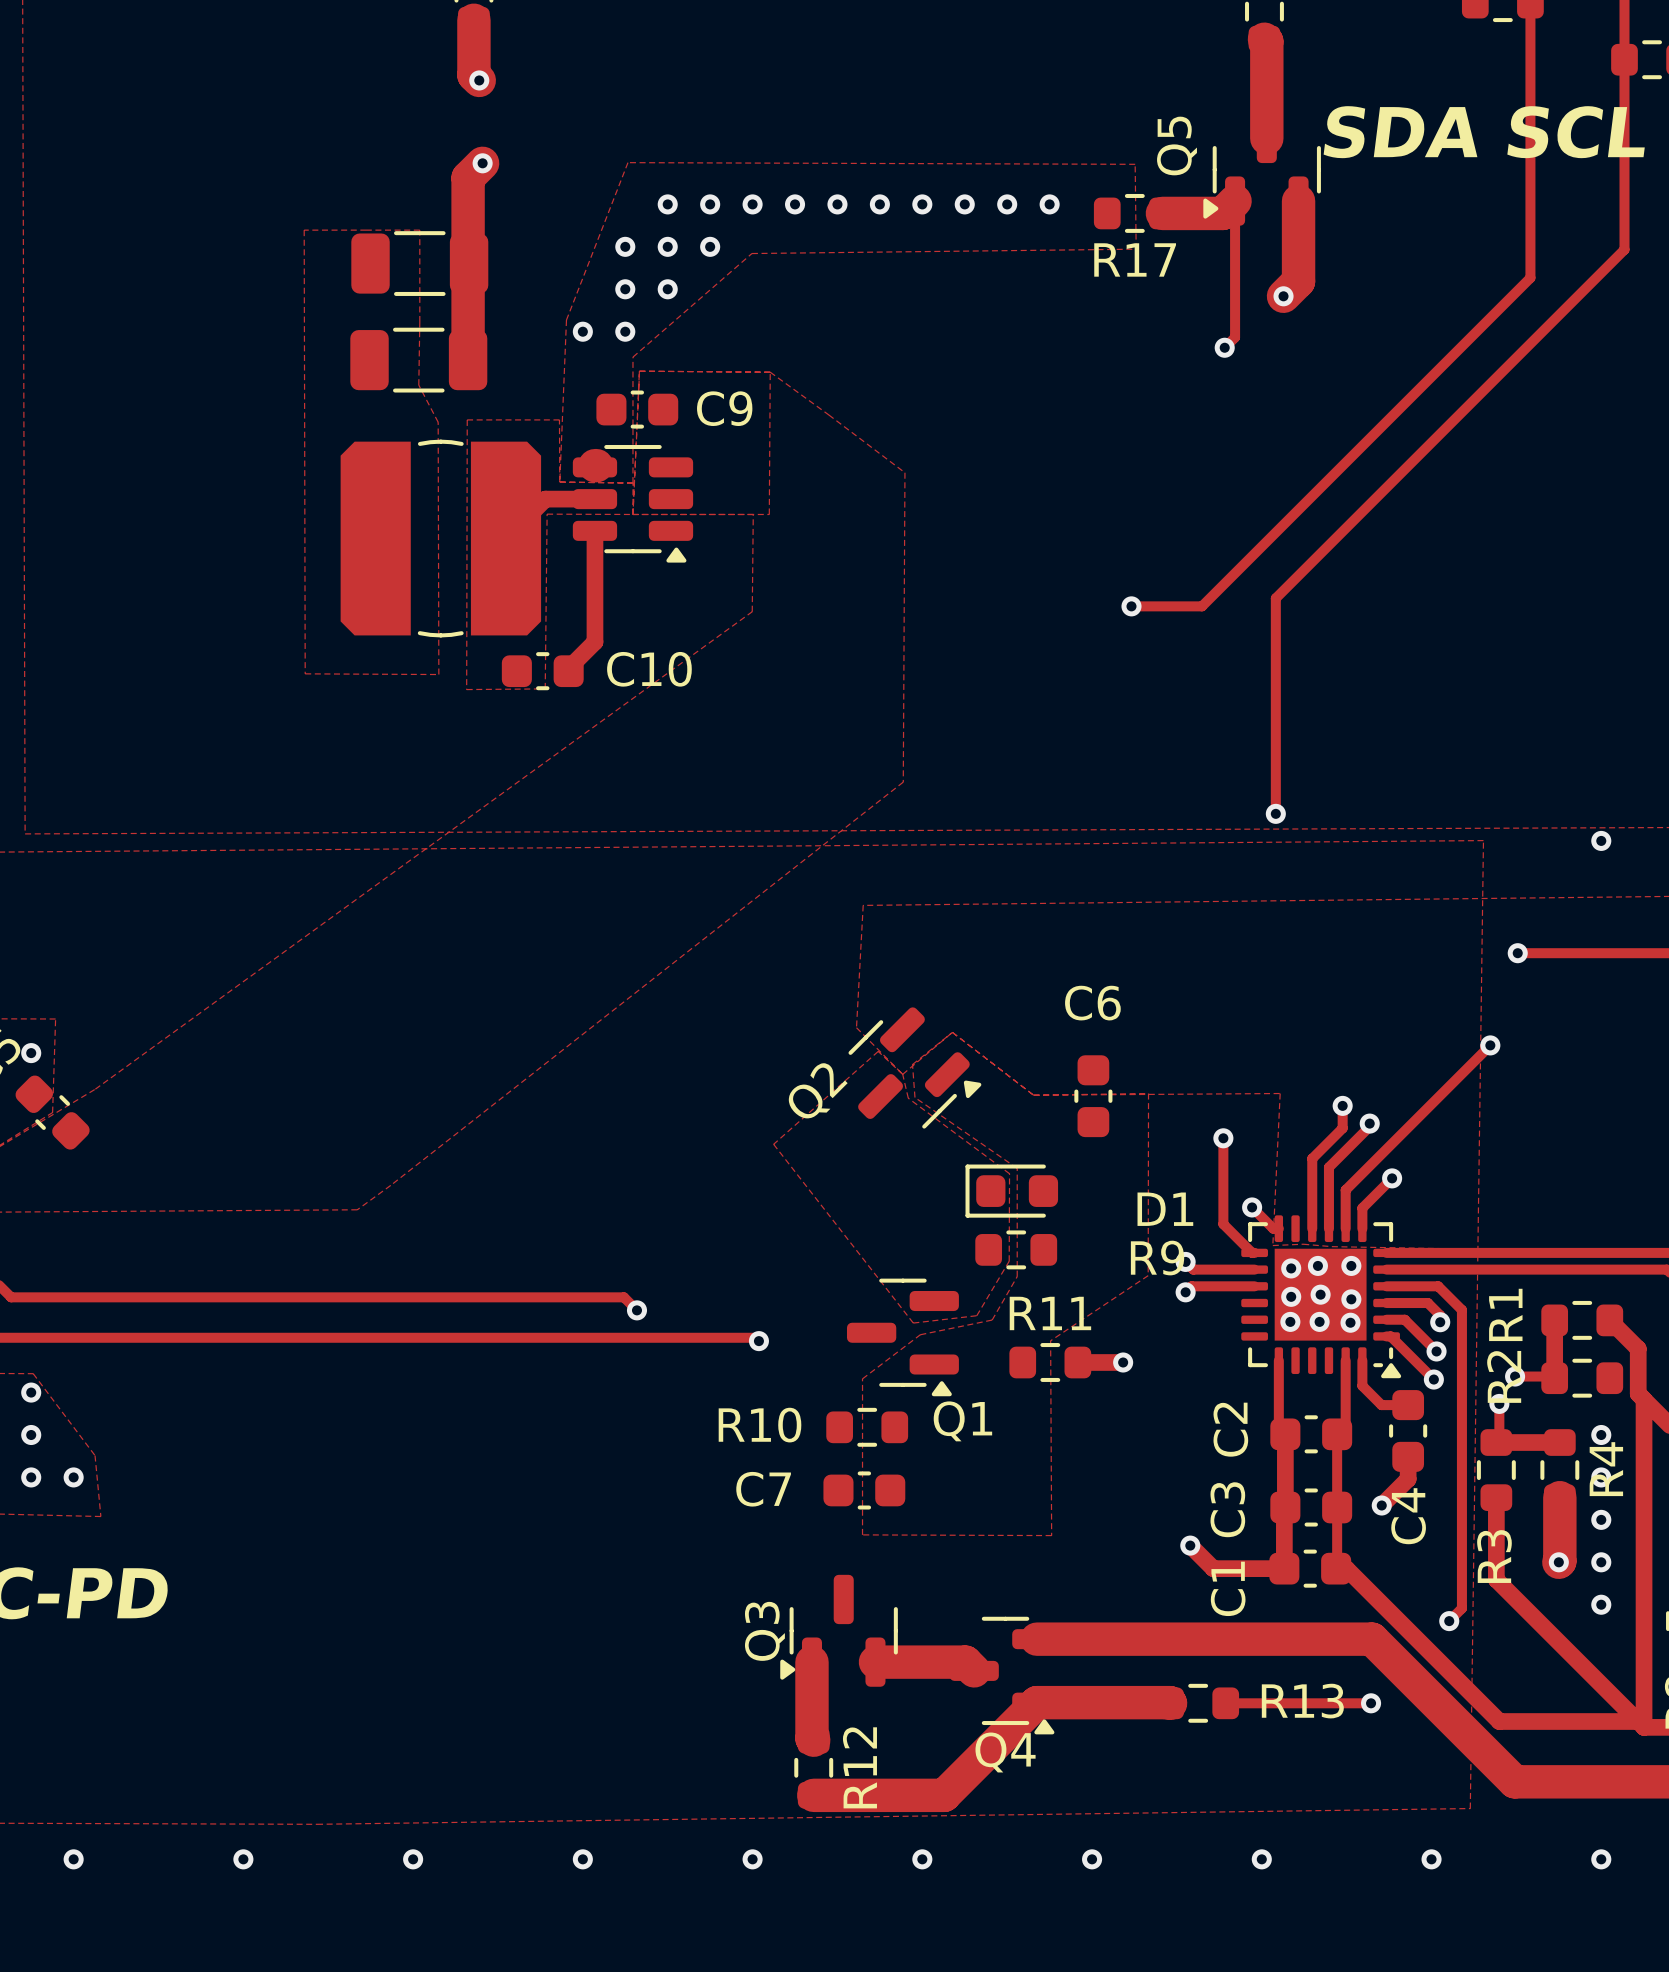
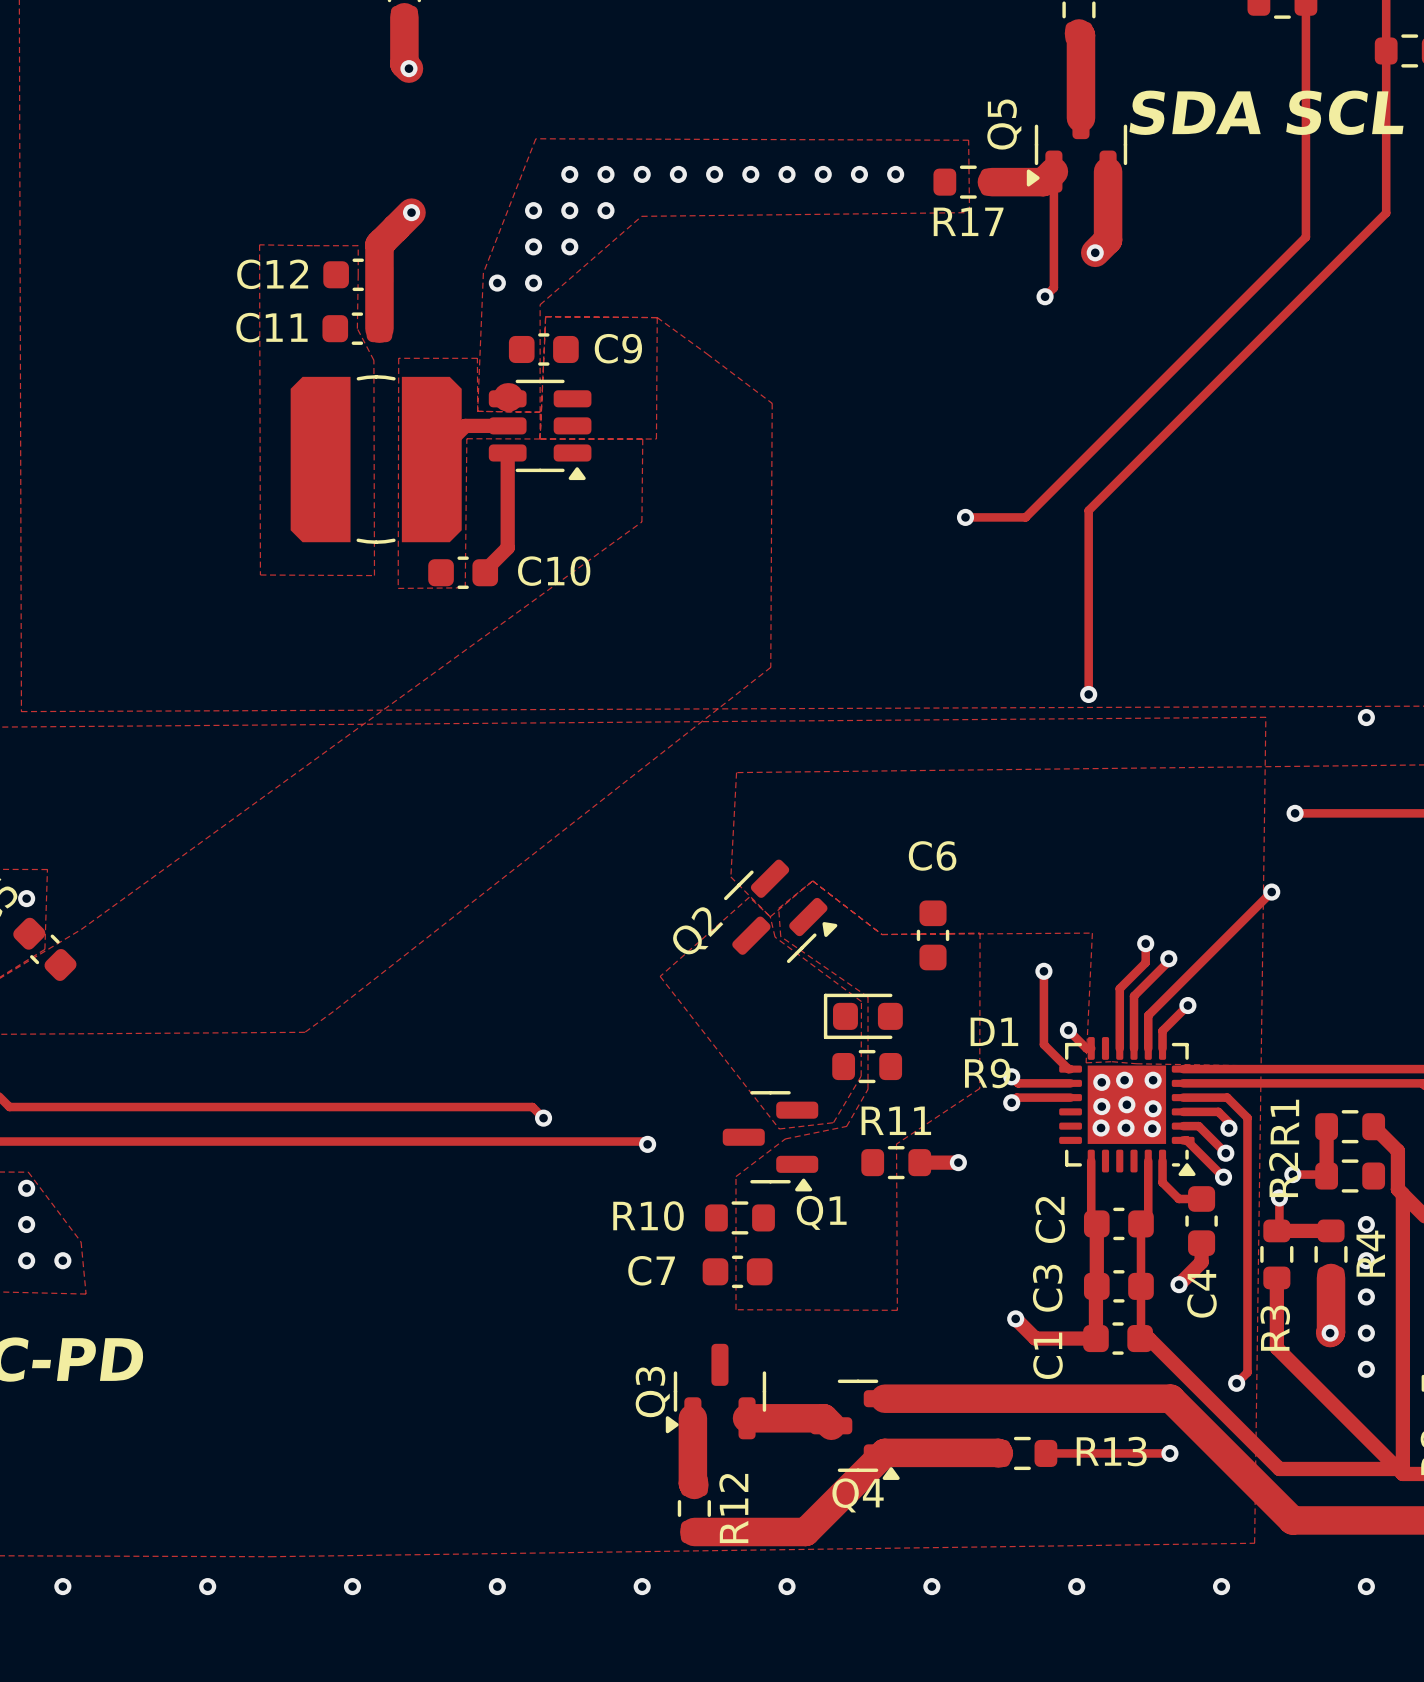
track: (482, 163) (468, 177) (468, 360) -> none
via position: (482, 163) -> (411, 212)
track: none -> (411, 212) (379, 244) (379, 328)
part: (419, 263) -> none
zone outline: (419, 287) (419, 230) (304, 230) (305, 673) -> (358, 245) (259, 244) (260, 575)
C12: none -> (358, 274)
part: (418, 360) -> none
C11: none -> (357, 328)

